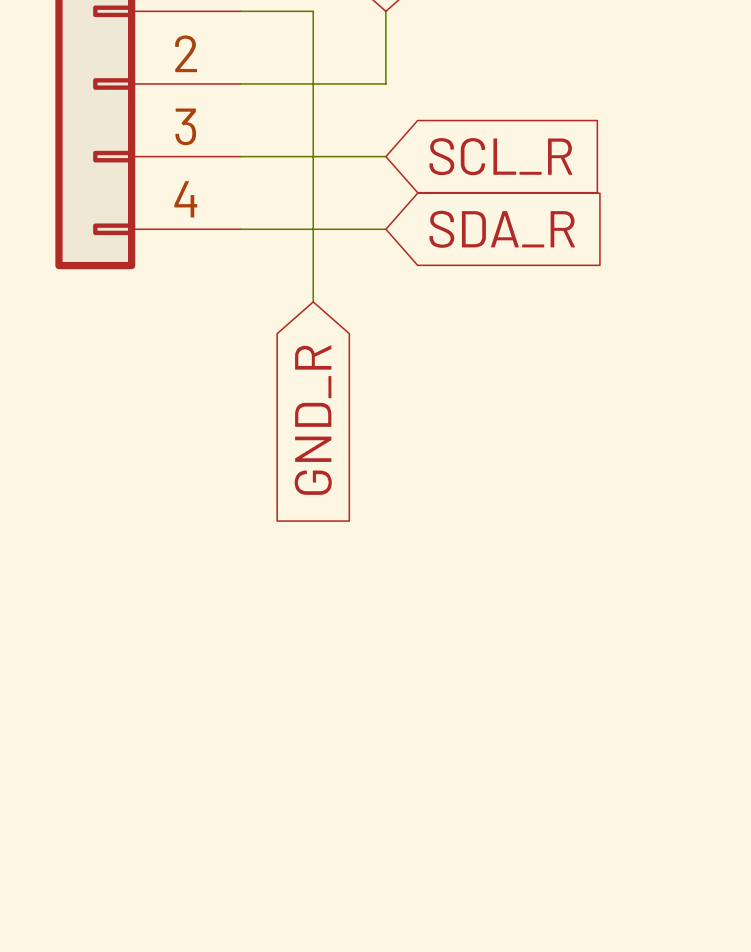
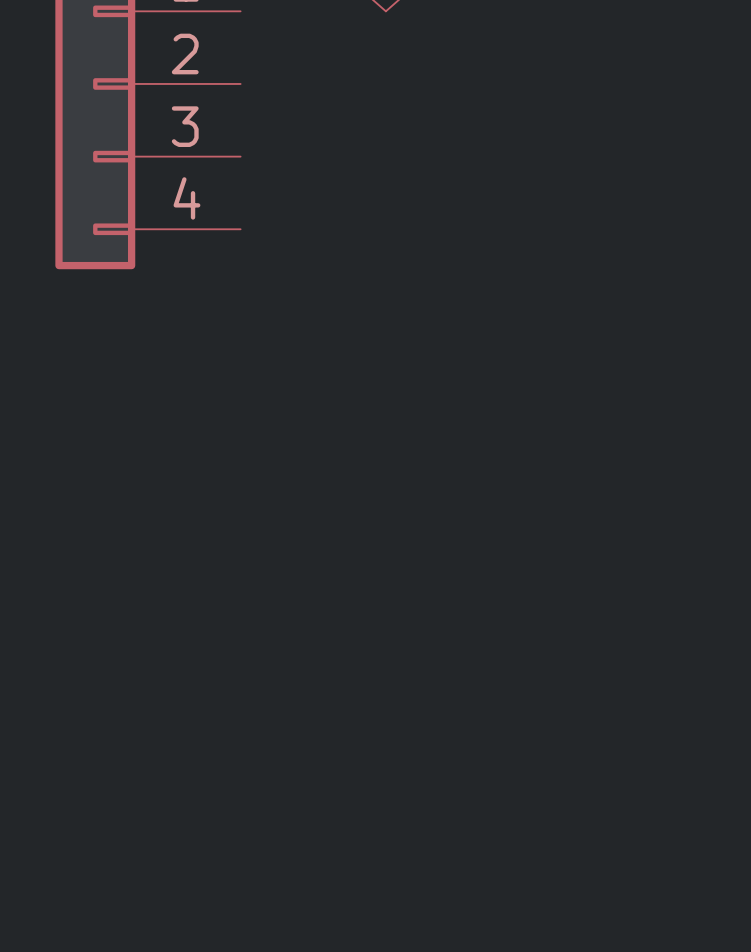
wire: (240, 11) (313, 11) (313, 301) -> none
wire: (385, 11) (385, 83) (240, 83) -> none
wire: (240, 156) (385, 156) -> none
global label: SCL_R (500, 156) -> none
wire: (240, 229) (385, 229) -> none
global label: SDA_R (502, 229) -> none
global label: GND_R (313, 420) -> none

